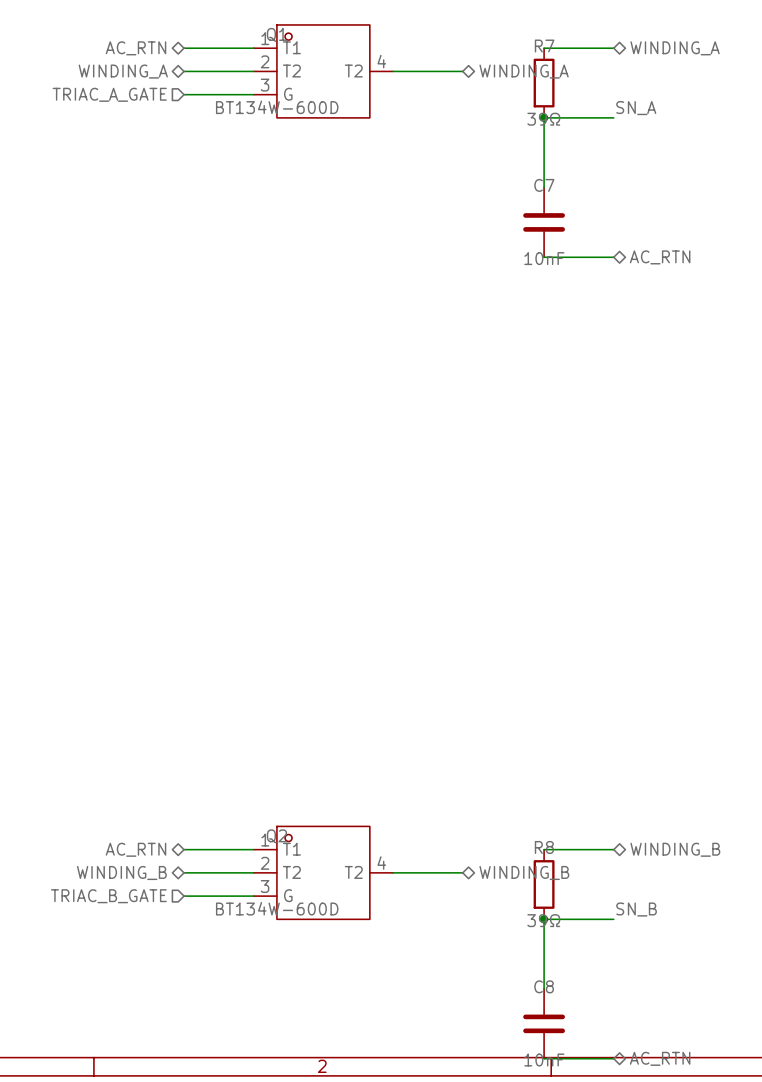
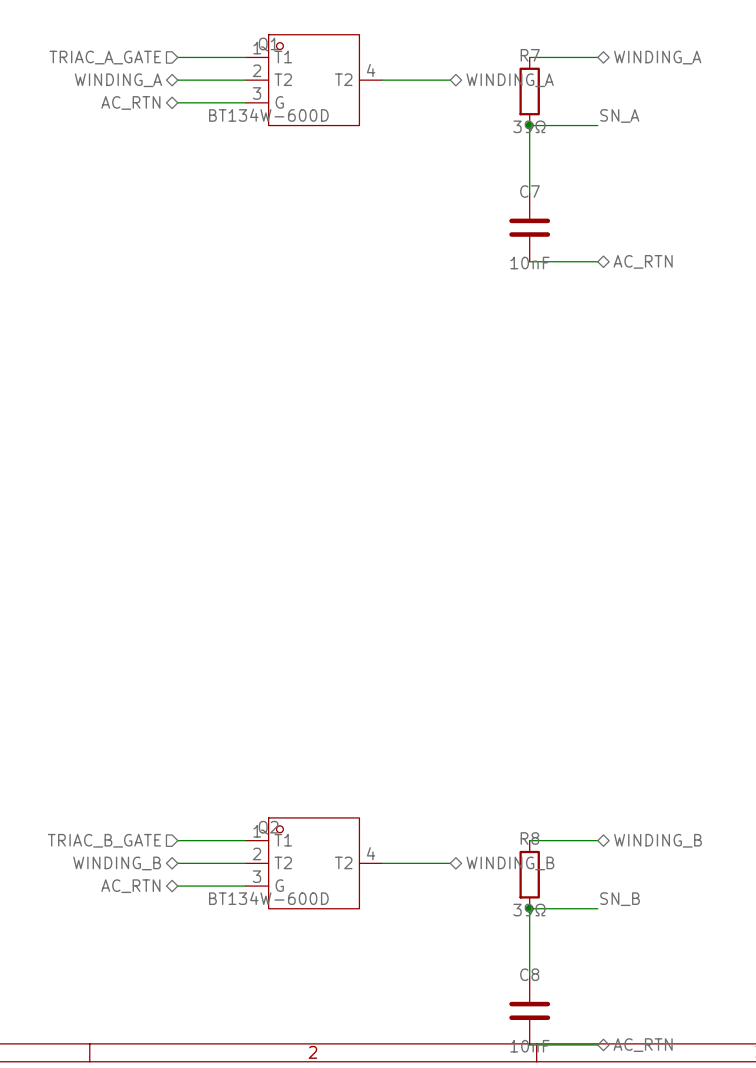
hierarchical label shape: bidirectional (135, 48) -> input (105, 57)
hierarchical label: AC_RTN (135, 48) -> TRIAC_A_GATE (105, 57)
hierarchical label shape: input (109, 94) -> bidirectional (130, 102)
hierarchical label: TRIAC_A_GATE (109, 94) -> AC_RTN (130, 102)
hierarchical label shape: bidirectional (135, 849) -> input (104, 840)
hierarchical label: AC_RTN (135, 849) -> TRIAC_B_GATE (104, 840)
hierarchical label shape: input (108, 896) -> bidirectional (130, 886)
hierarchical label: TRIAC_B_GATE (108, 896) -> AC_RTN (130, 886)

